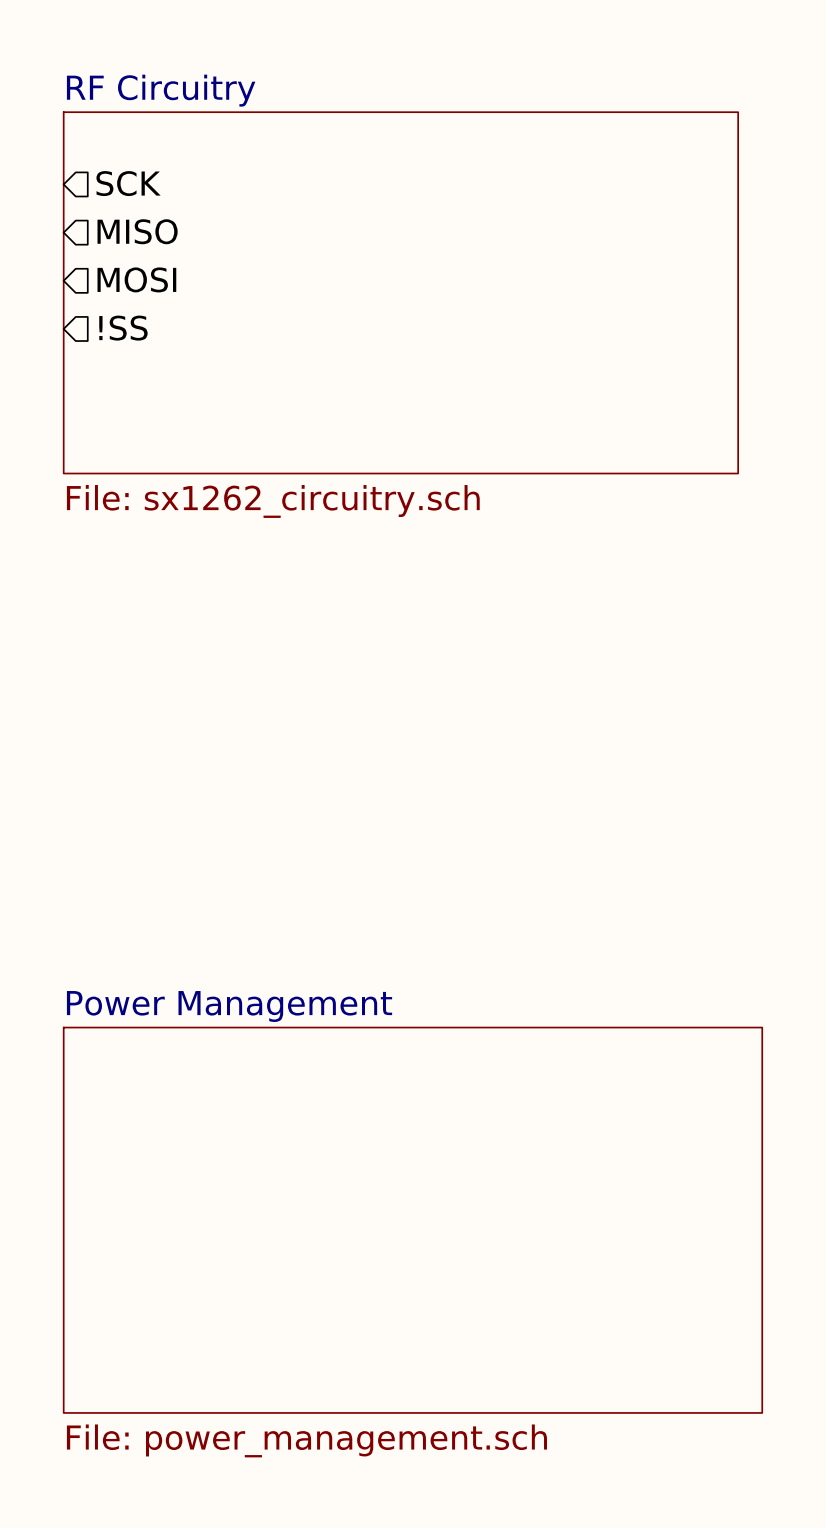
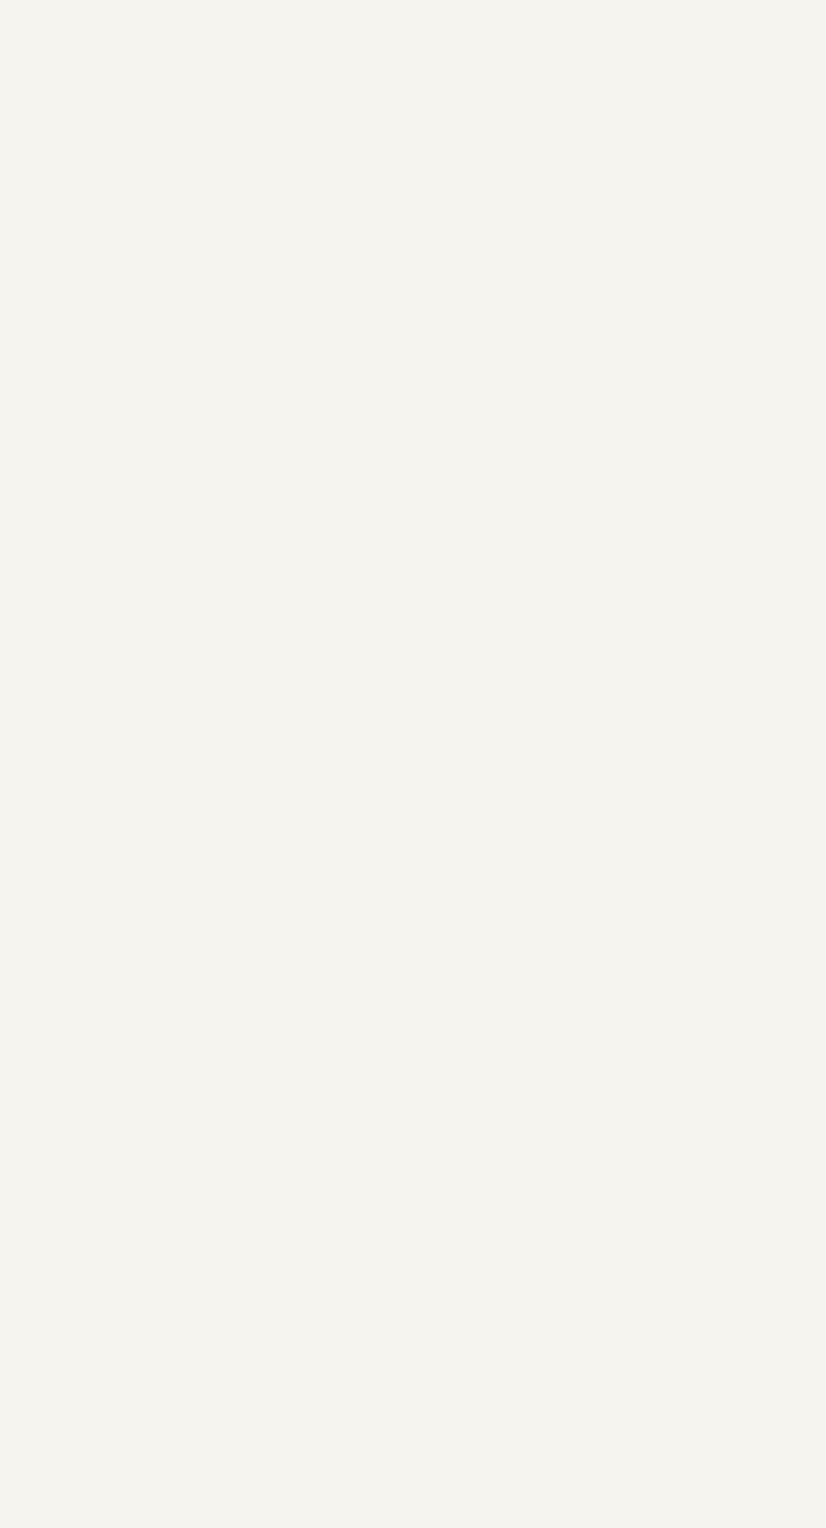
sheet pin: SCK (128, 183) -> none
sheet pin: MISO (137, 231) -> none
sheet pin: MOSI (136, 279) -> none
sheet RF Circuitry: File: sx1262_circuitry.sch (400, 292) -> none
sheet pin: !SS (123, 328) -> none
sheet Power Management: File: power_management.sch (412, 1220) -> none

